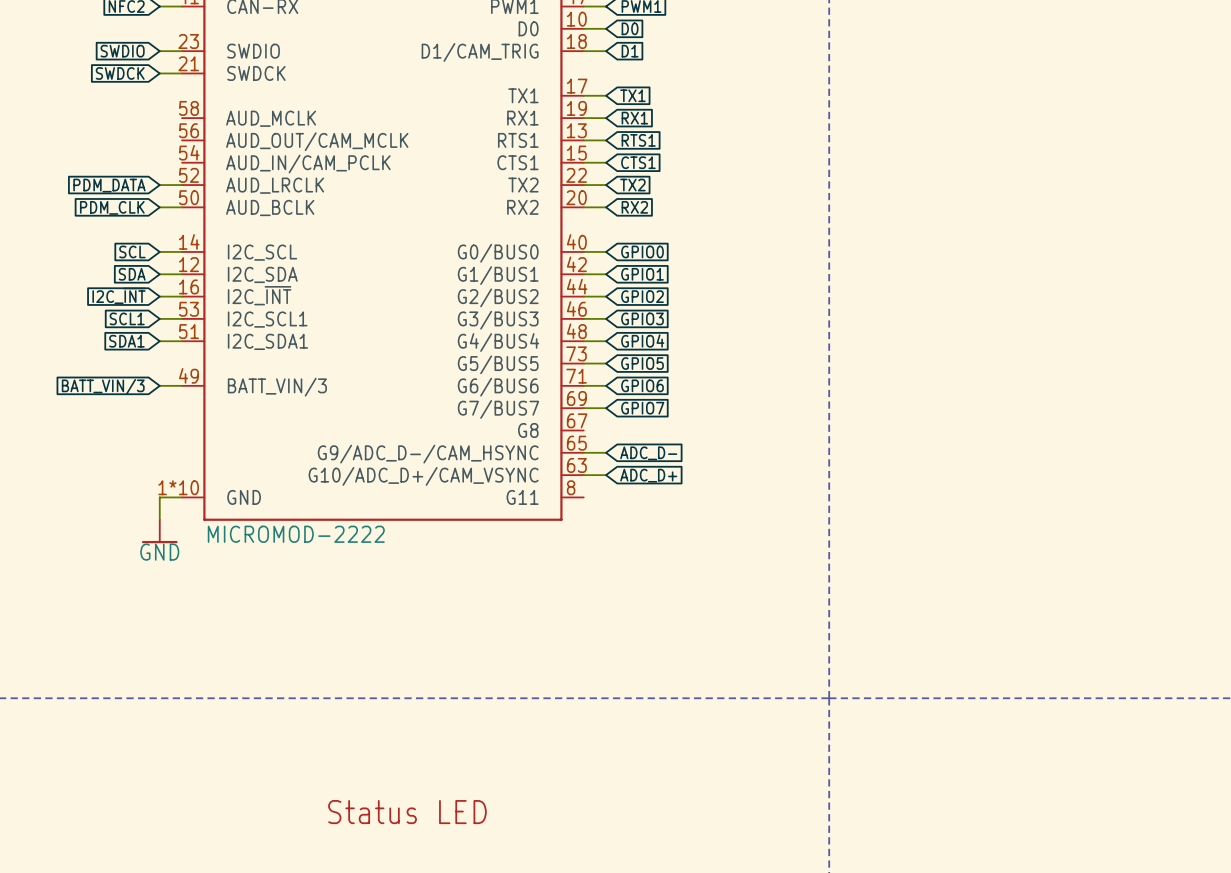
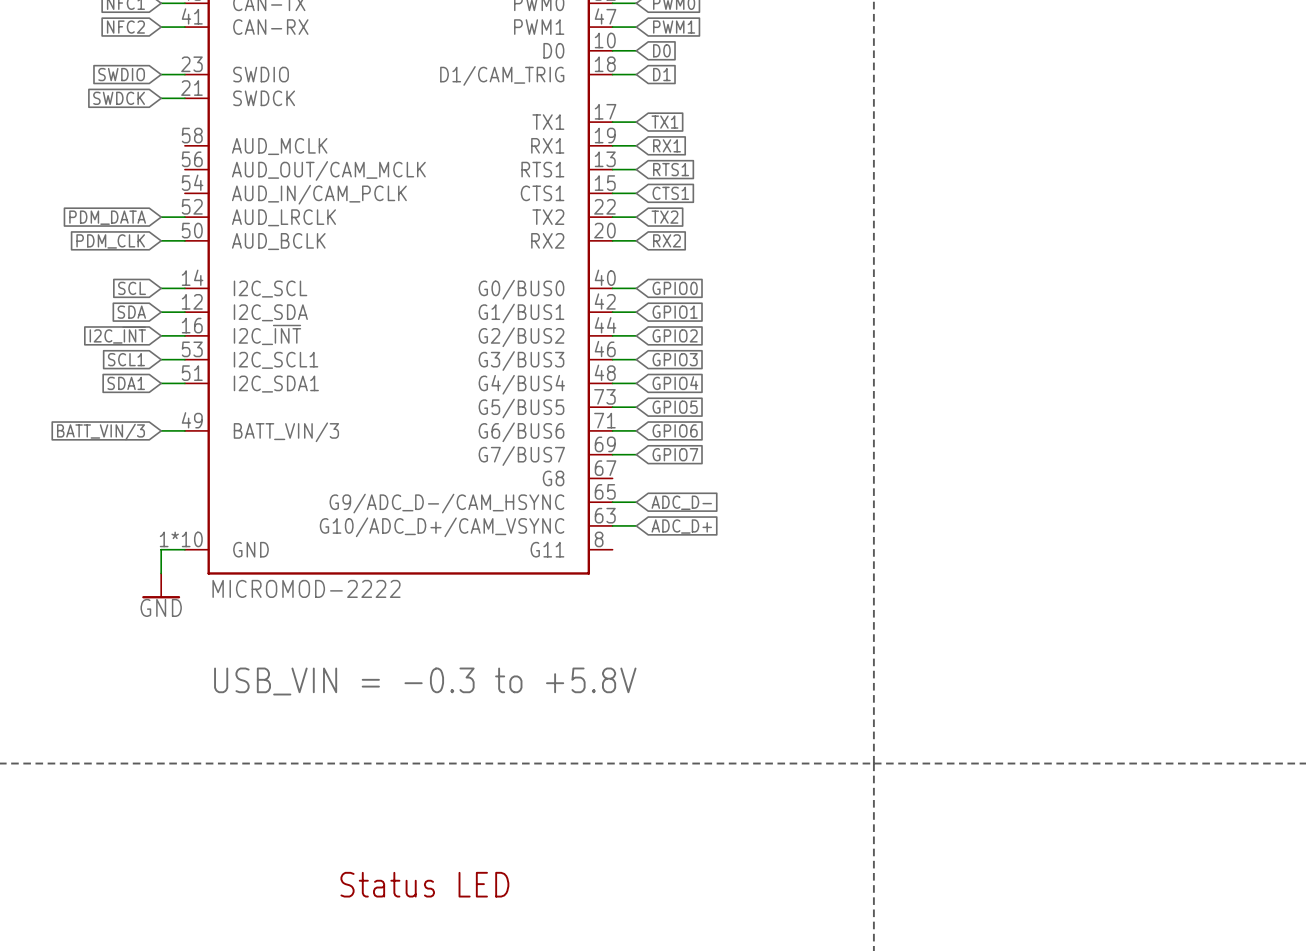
text: none -> USB_VIN = -0.3 to +5.8V (425, 681)

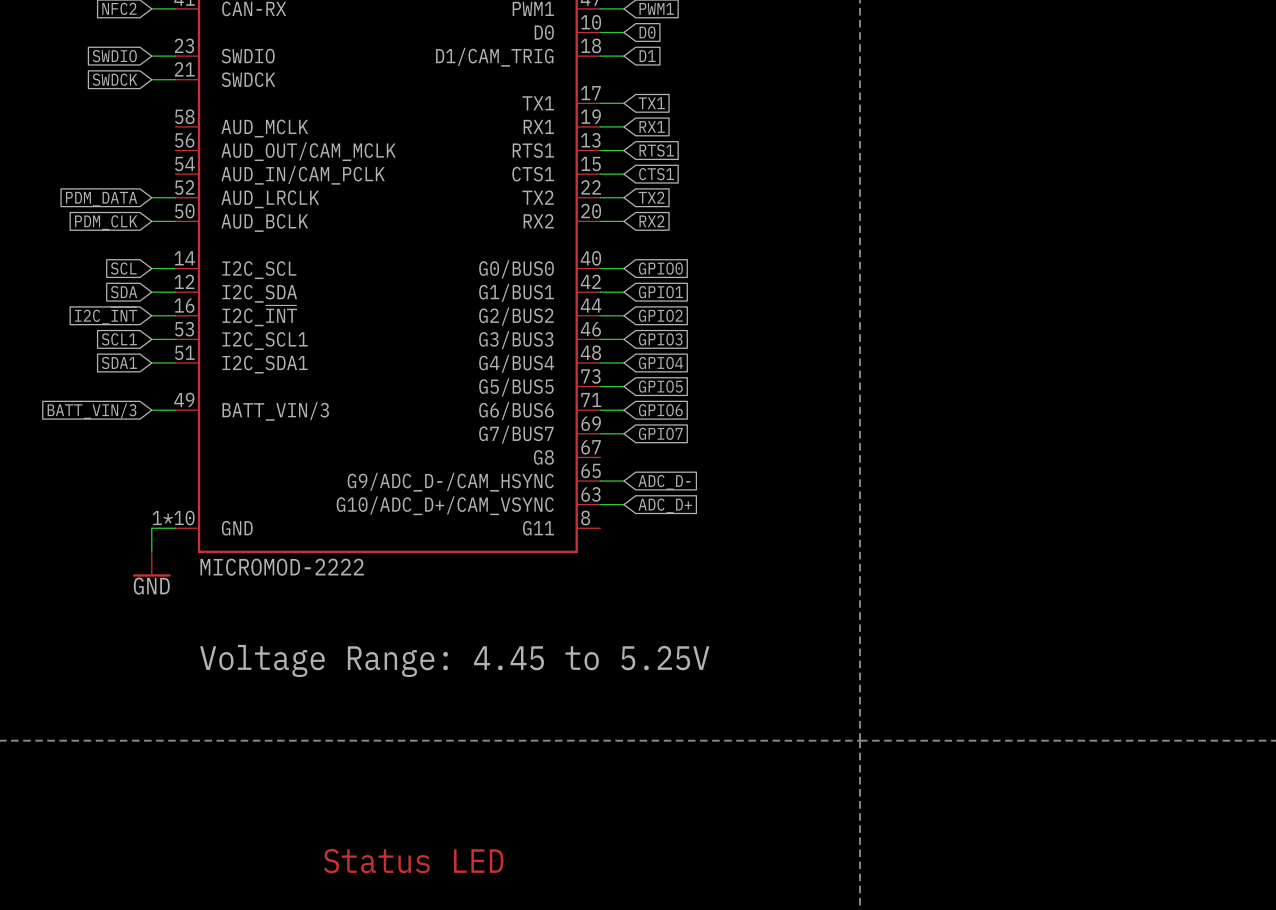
text: USB_VIN = -0.3 to +5.8V (425, 681) -> Voltage Range: 4.45 to 5.25V (454, 660)

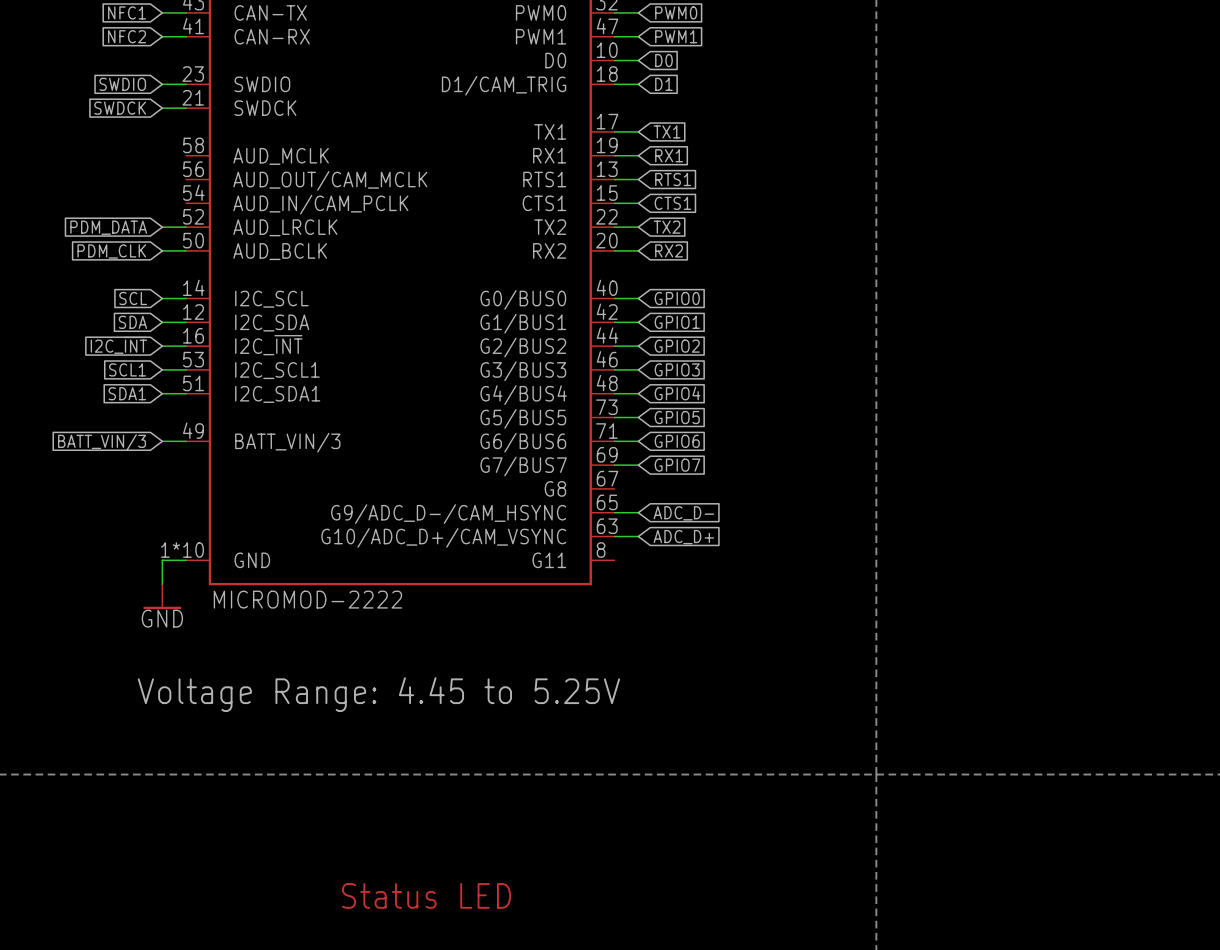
text position: Voltage Range: 4.45 to 5.25V (454, 660) -> Voltage Range: 4.45 to 5.25V (378, 694)

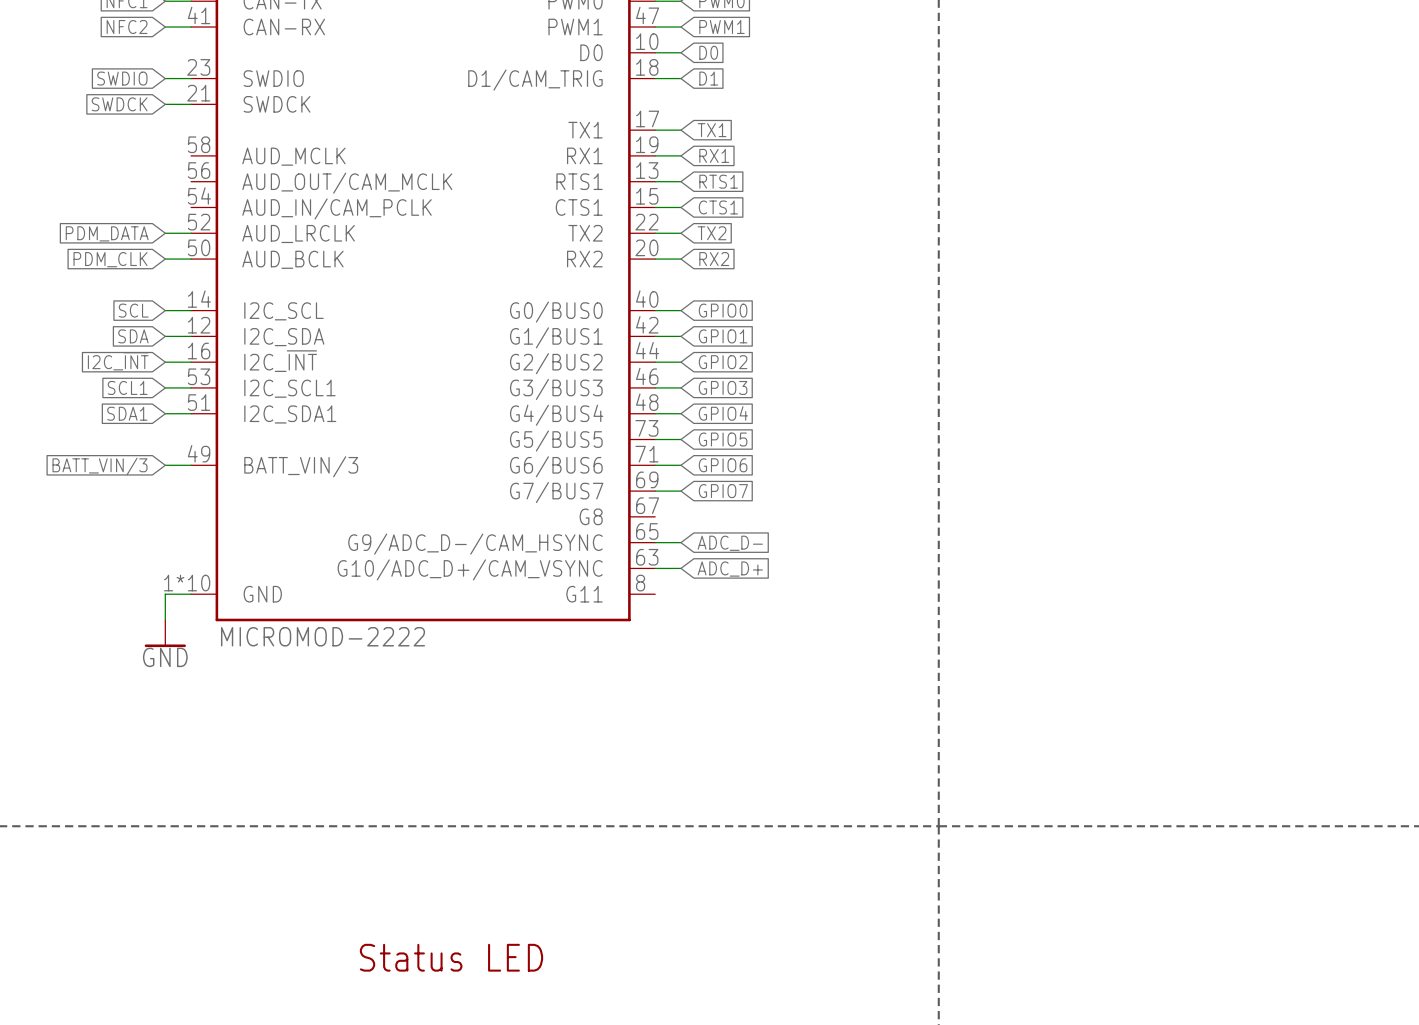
text: Voltage Range: 4.45 to 5.25V (378, 694) -> none

